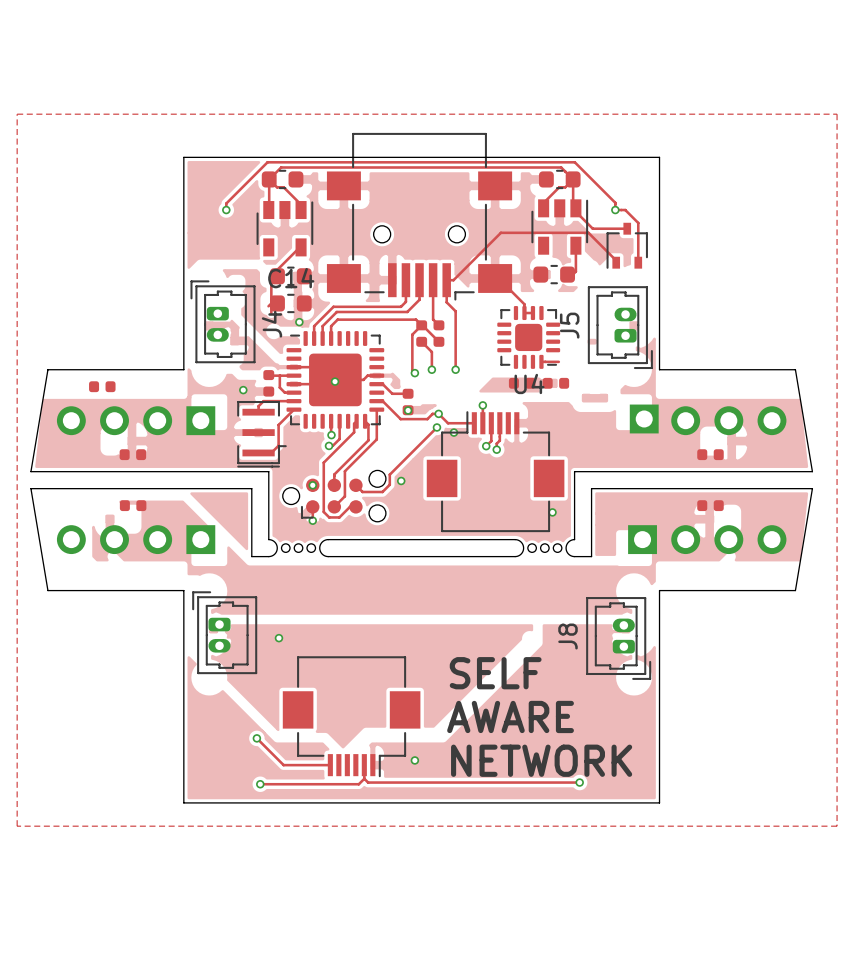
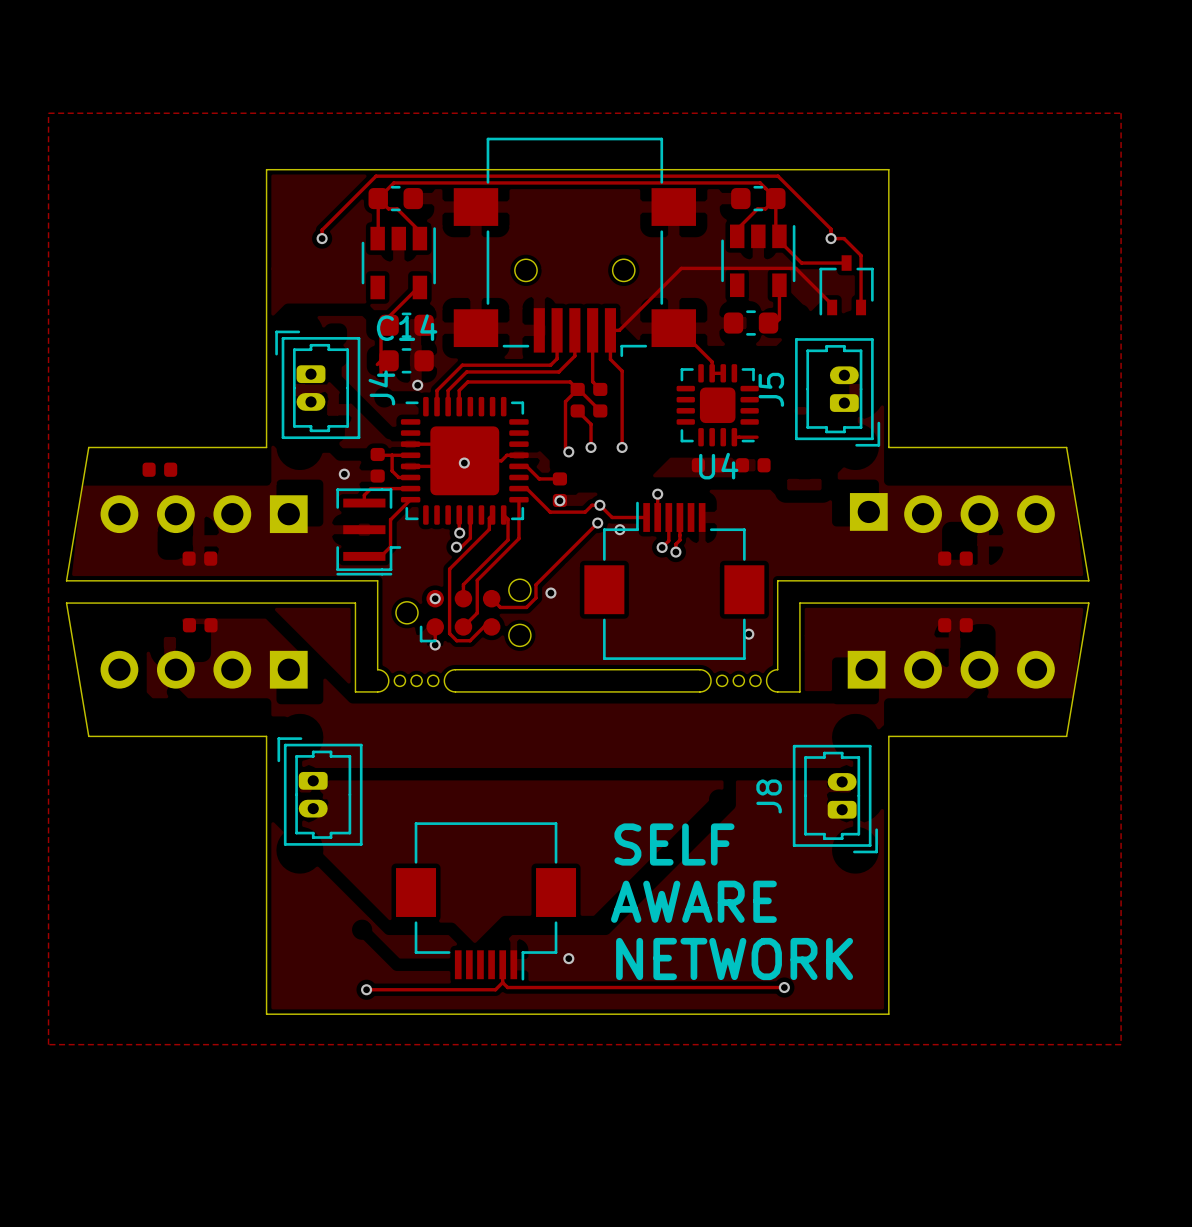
via: (278, 638) -> none
track: (256, 738) (283, 765) (330, 765) -> none
via: (256, 738) -> none

